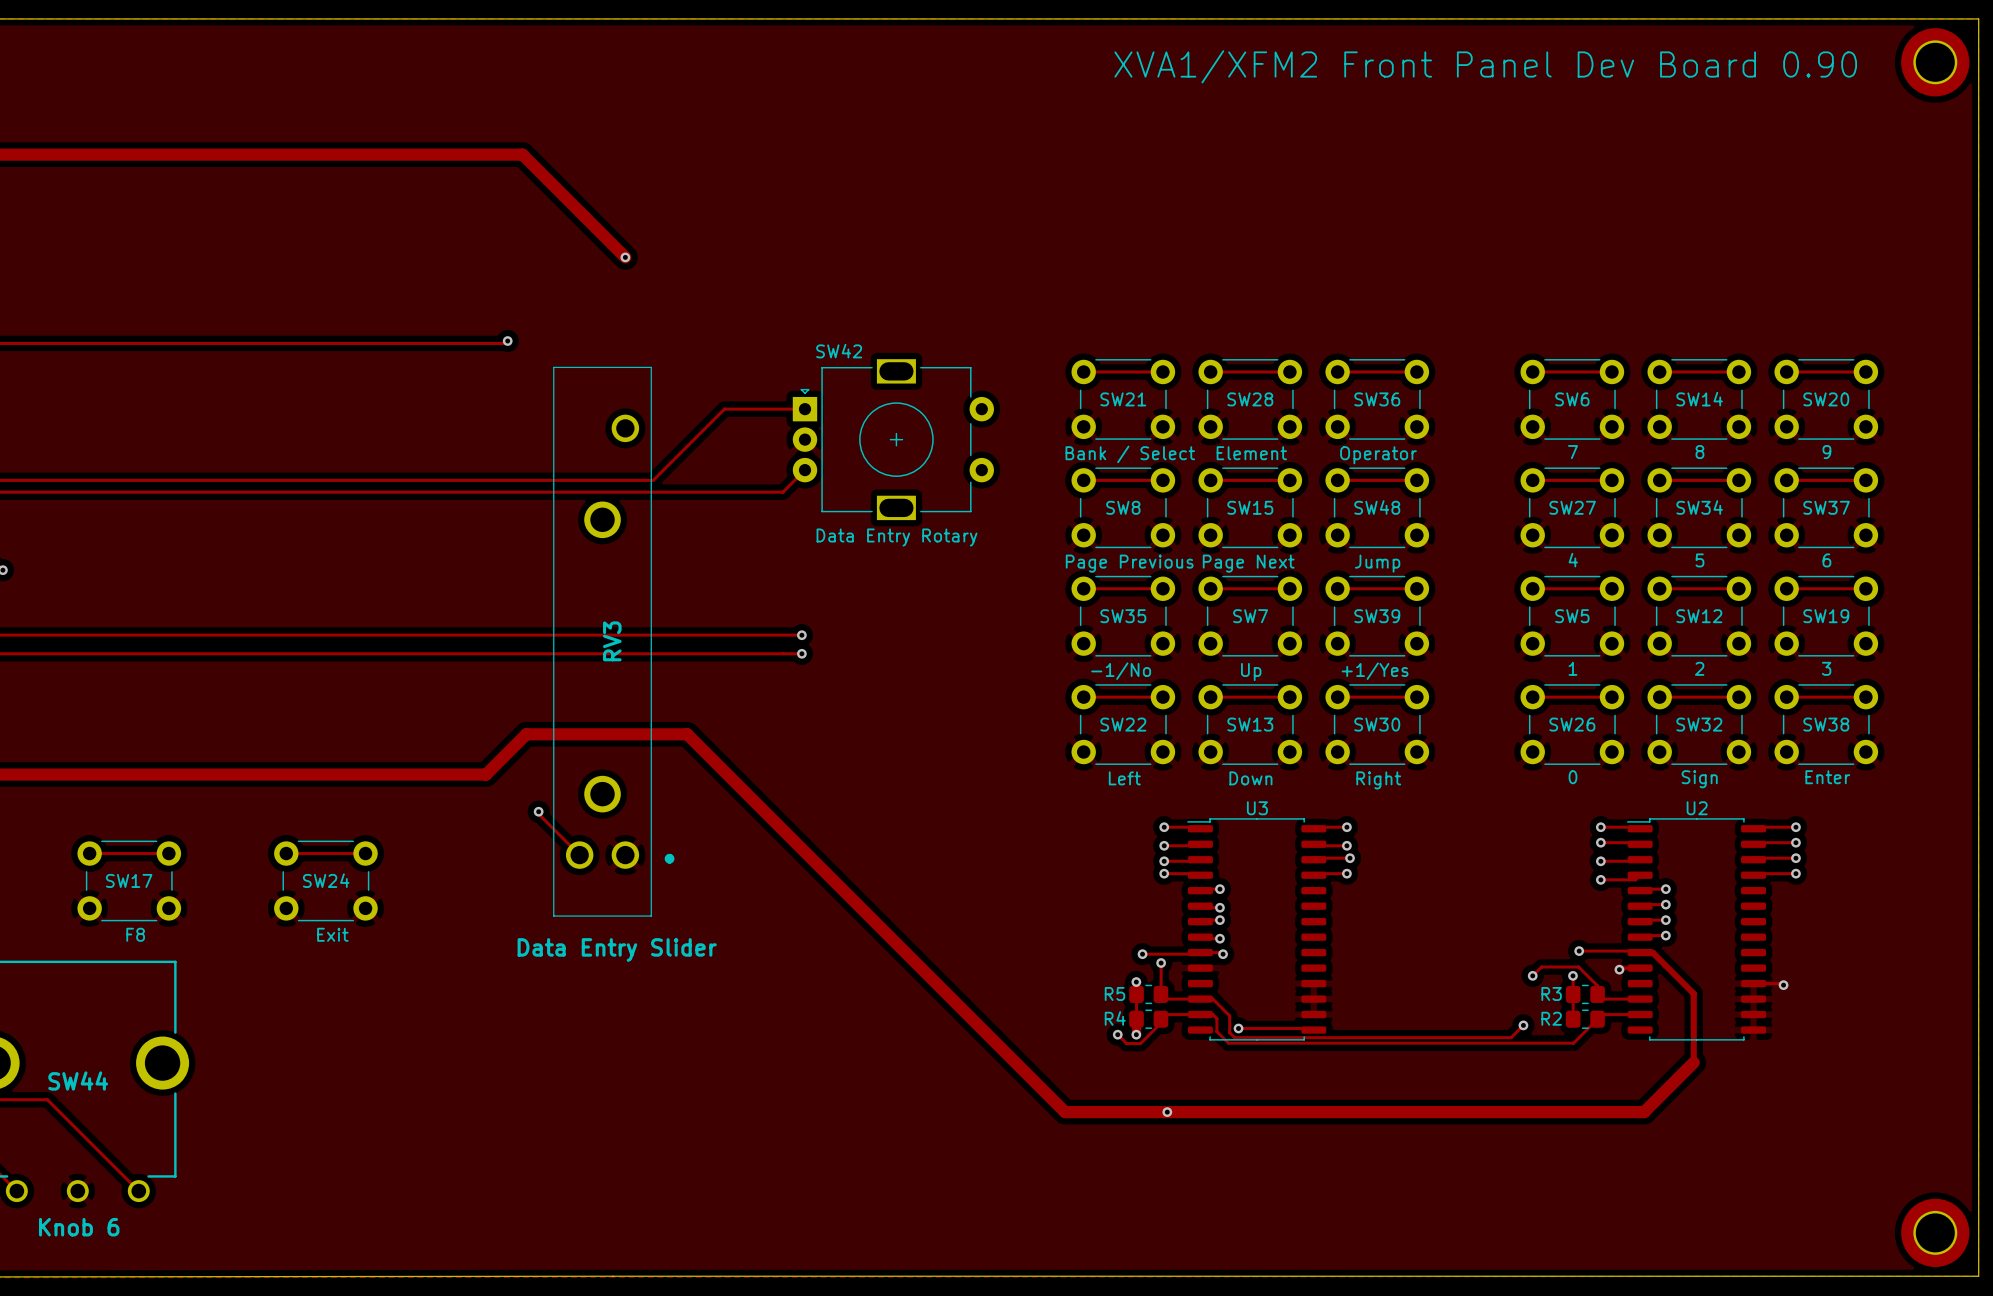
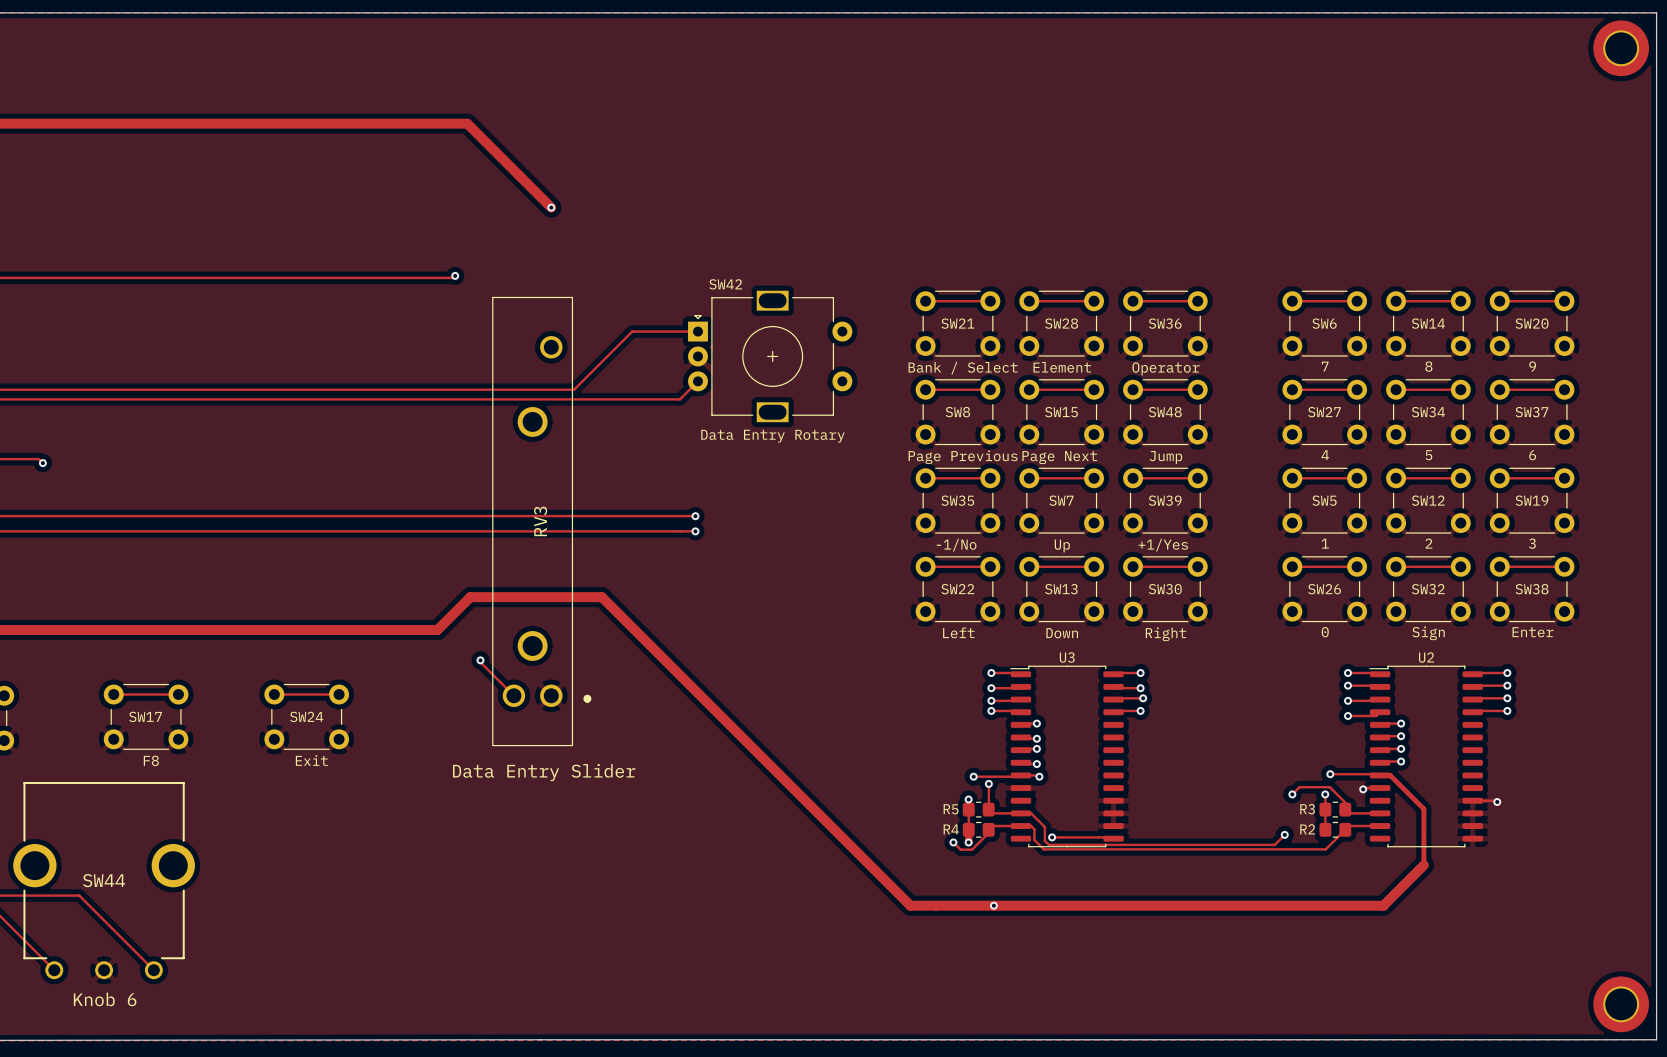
text: XVA1/XFM2 Front Panel Dev Board 0.90 (1485, 66) -> none

